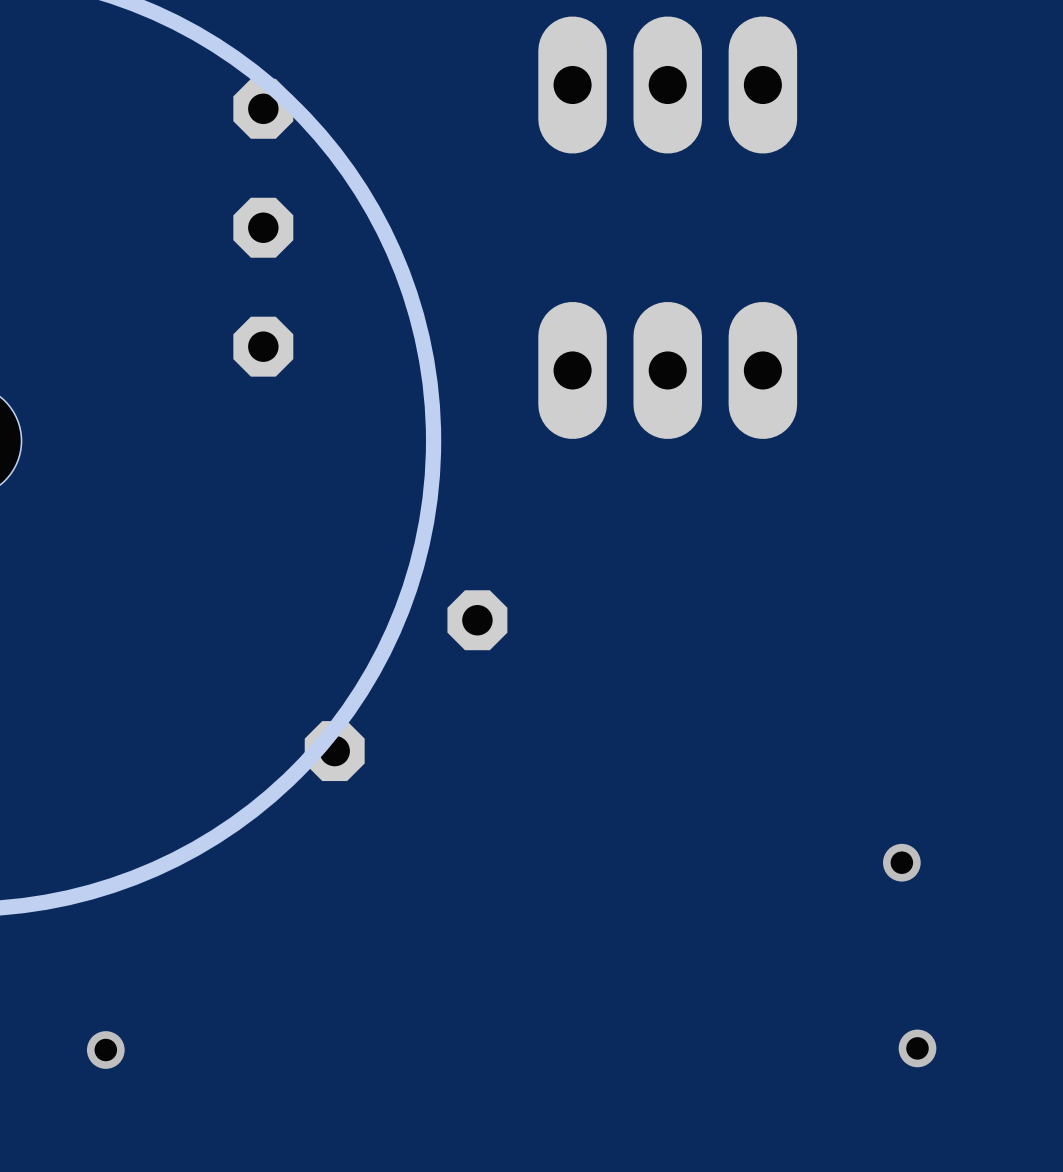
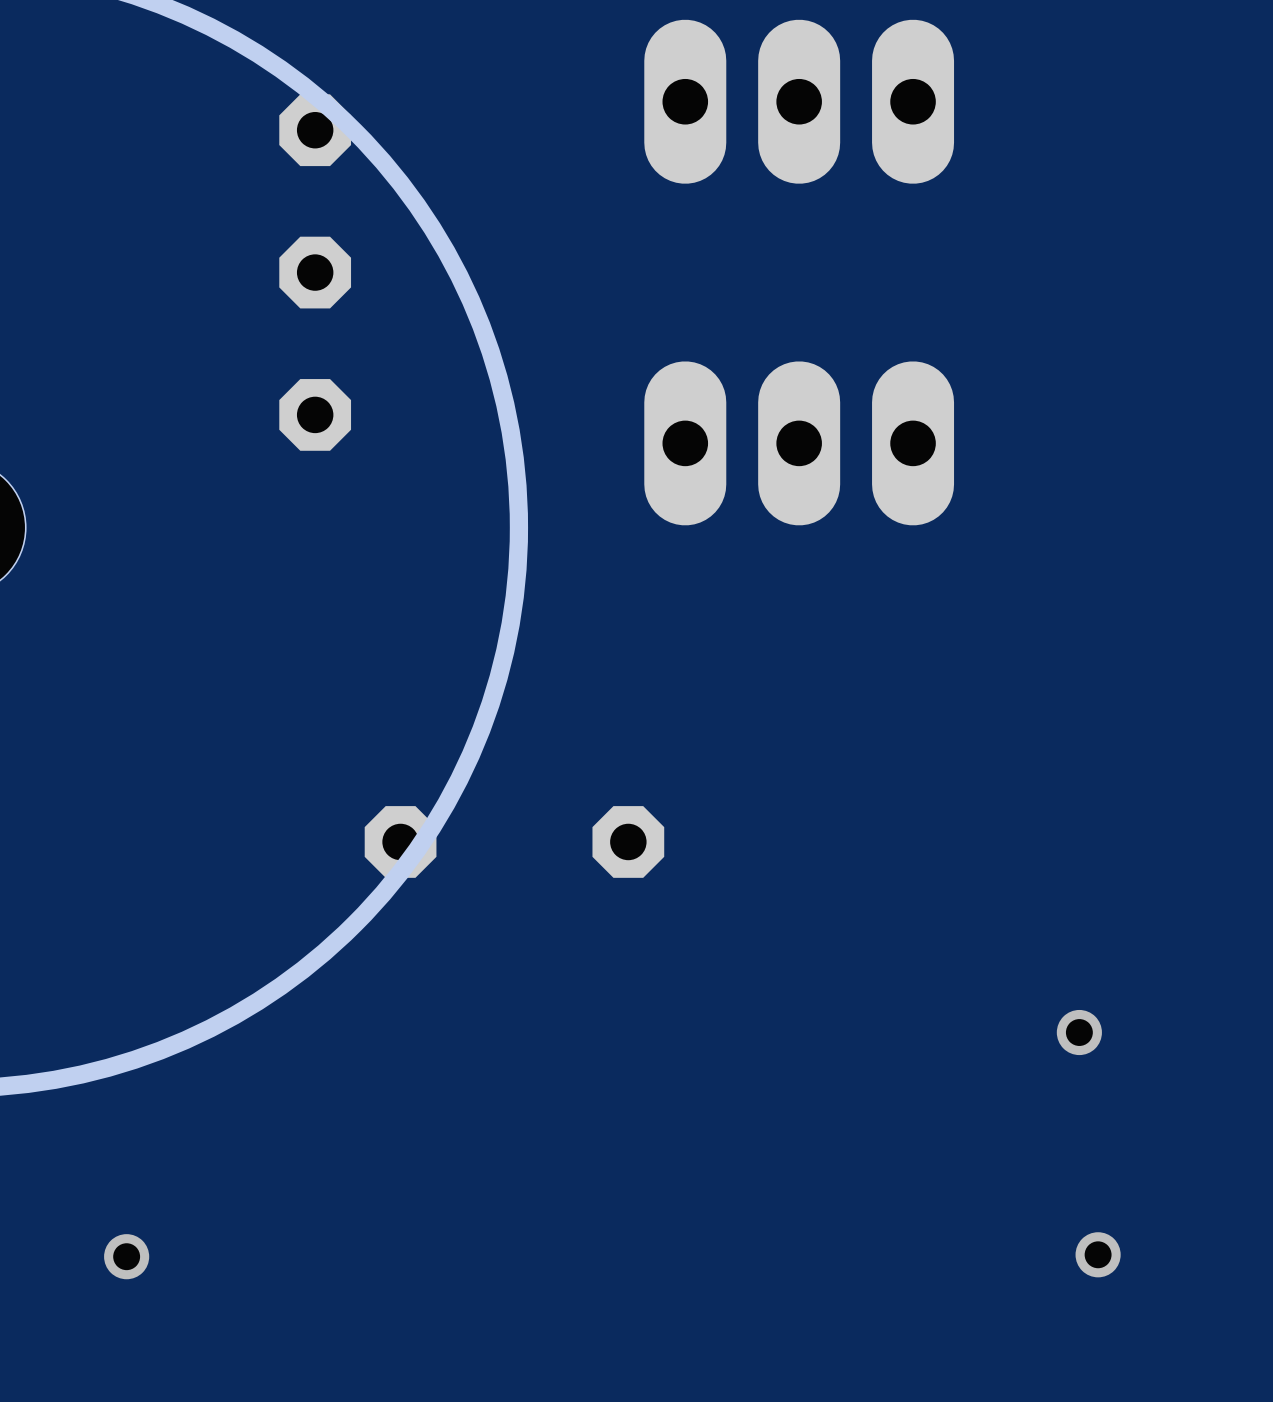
part: (477, 620) -> none
part: none -> (628, 841)
part position: (334, 751) -> (400, 841)

